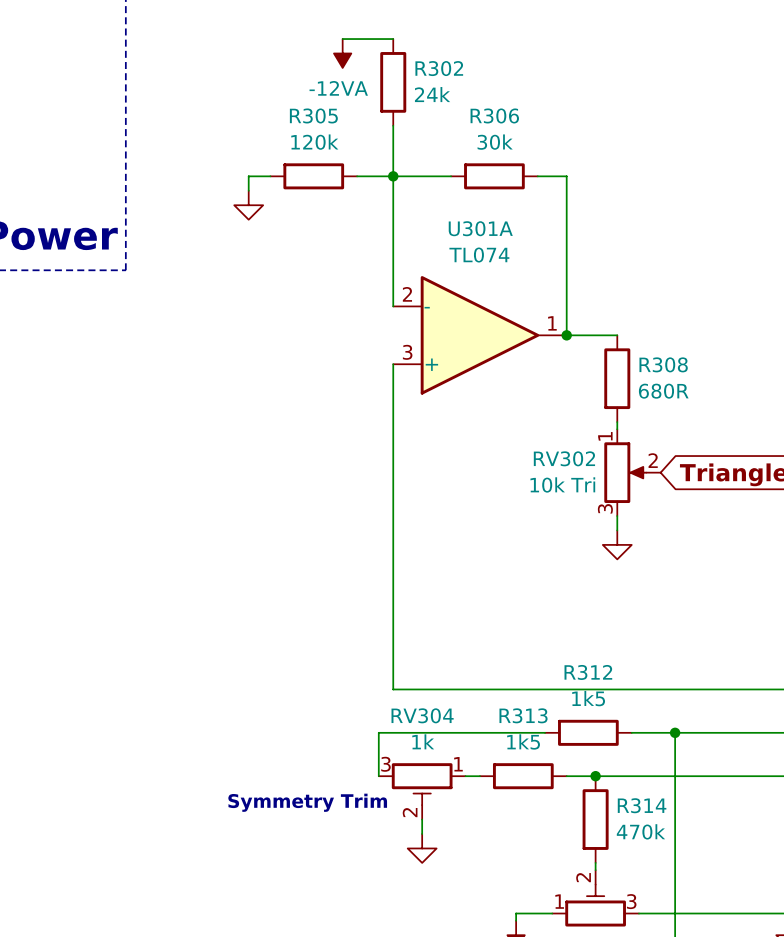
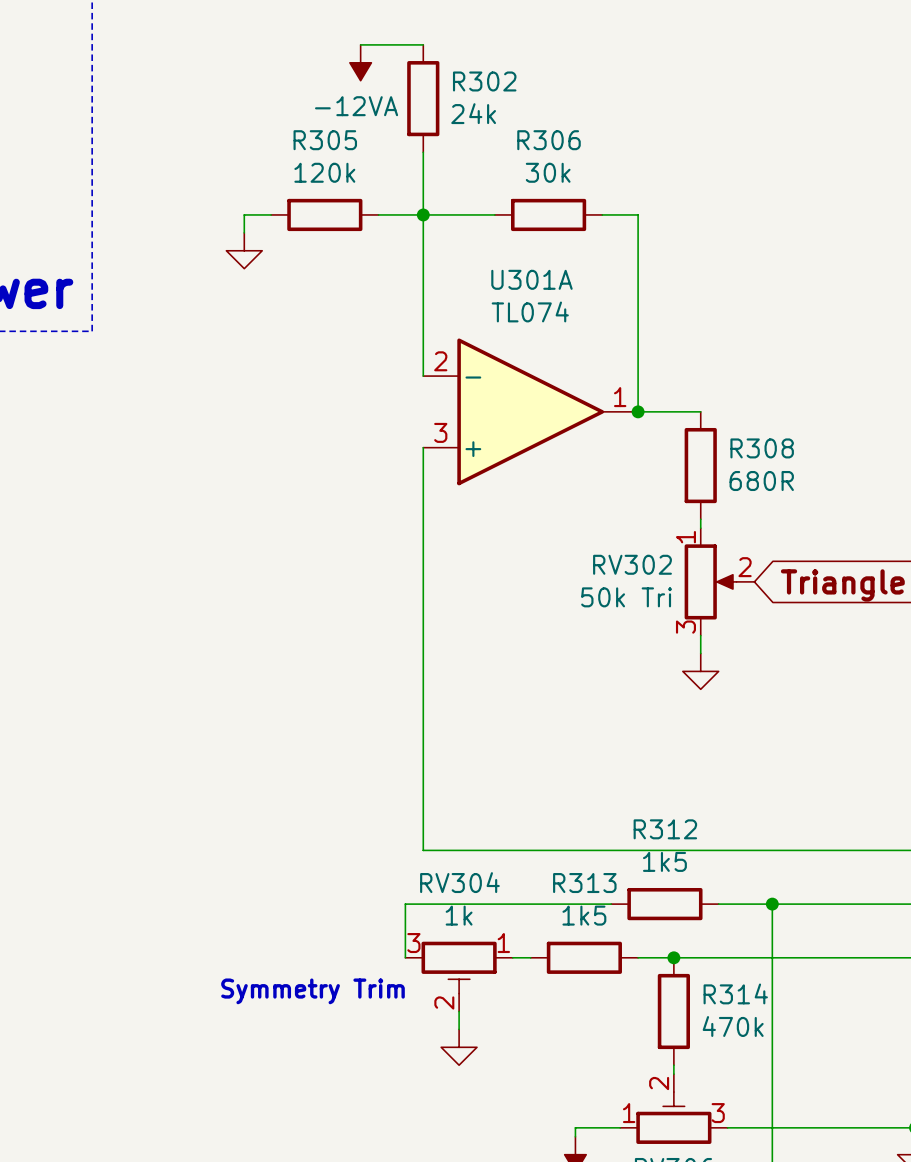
RV302 value: 10k Tri (562, 484) -> 50k Tri (626, 597)

